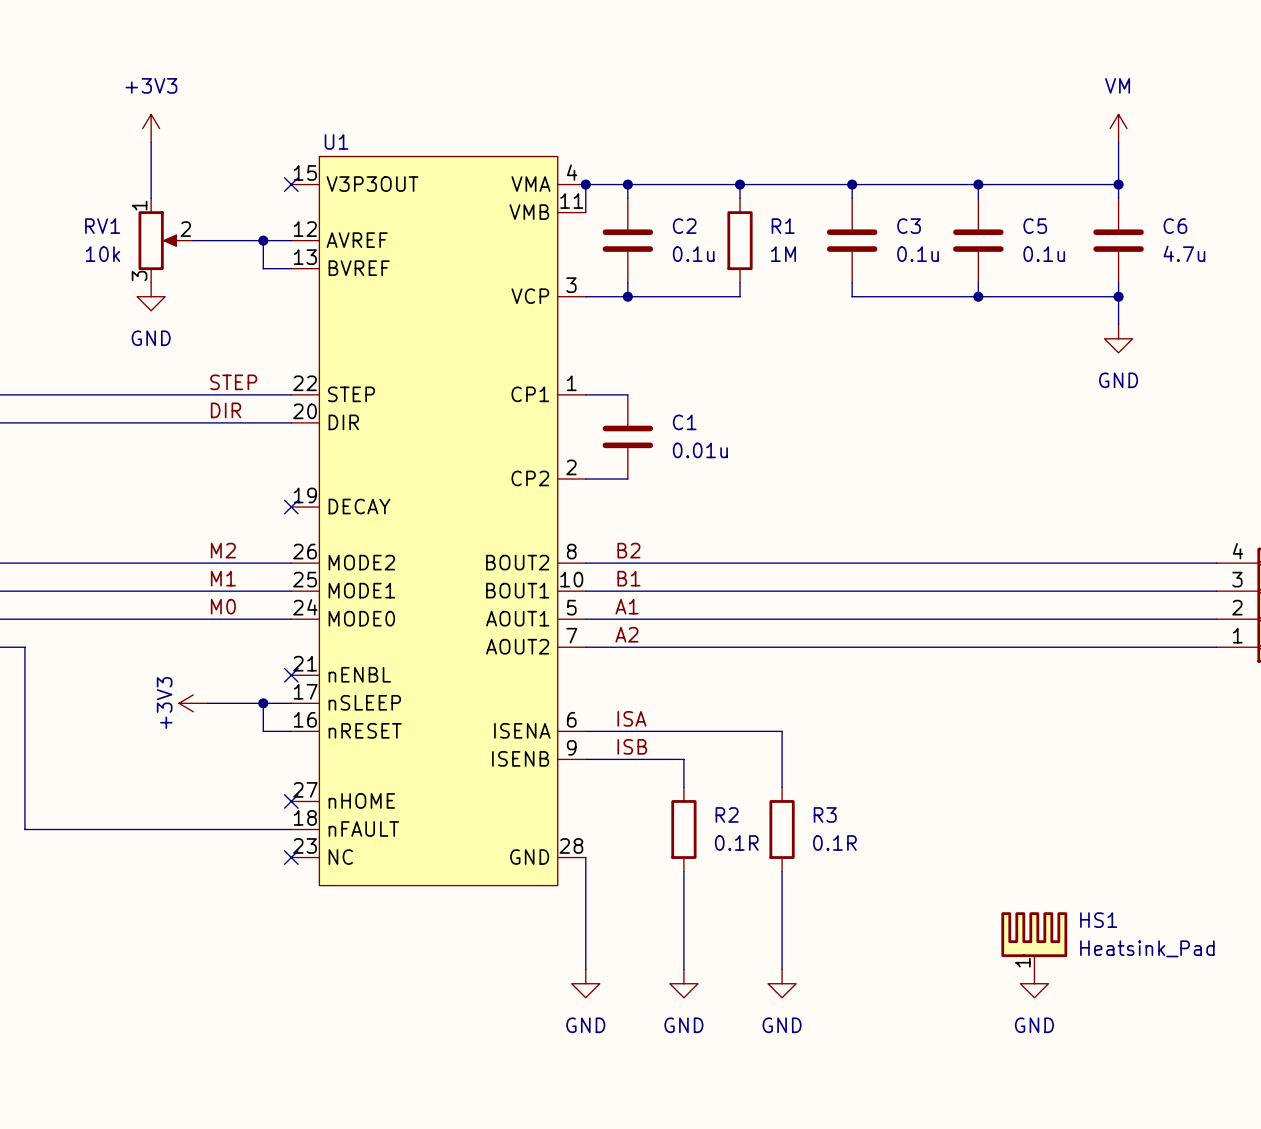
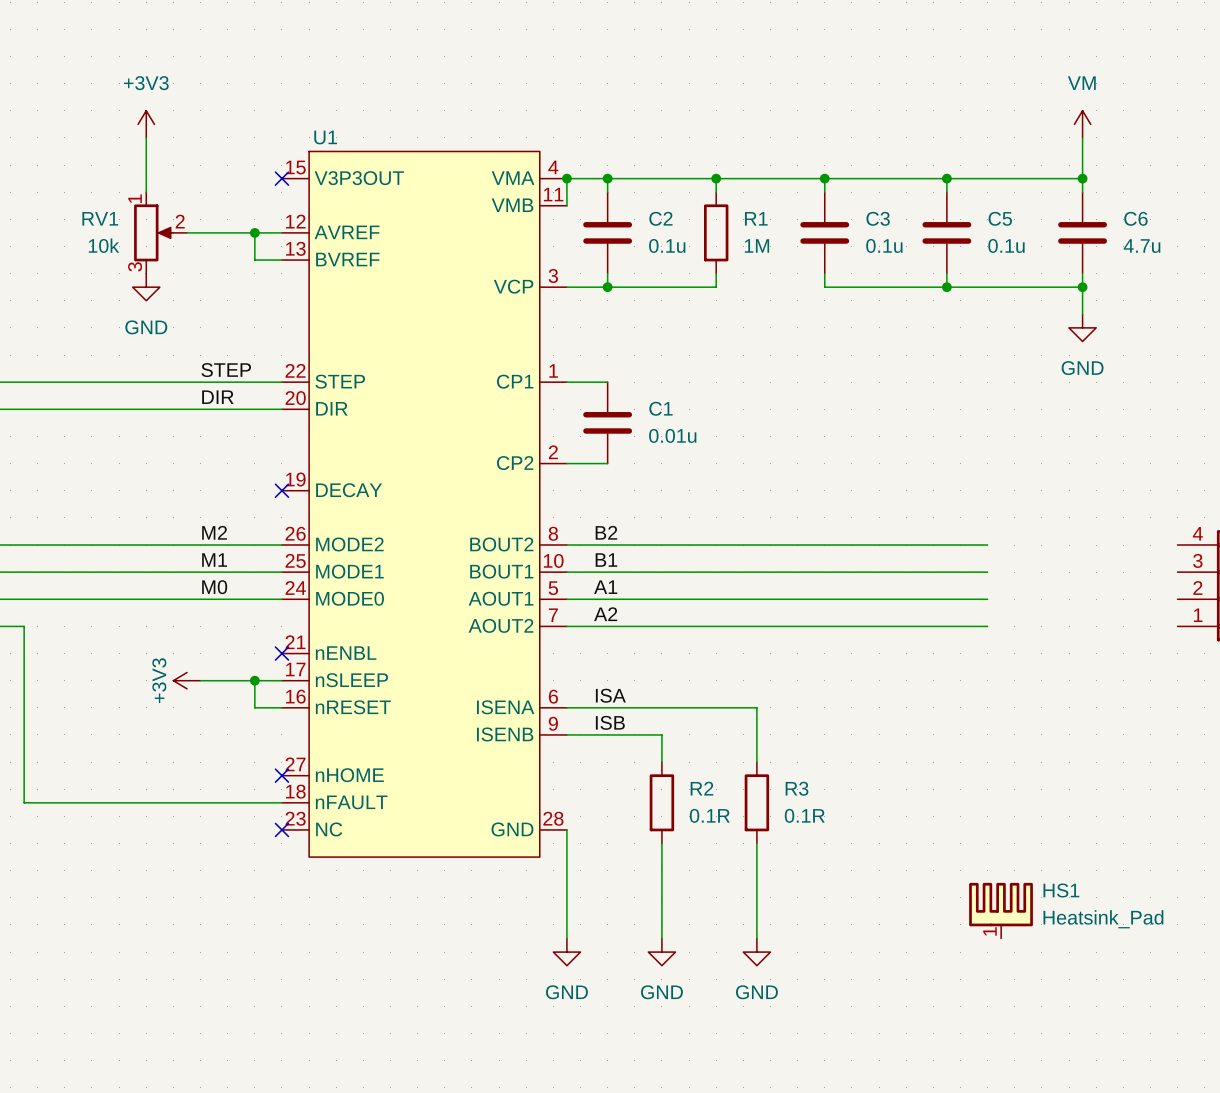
wire: (1020, 563) (1216, 563) -> none
wire: (1020, 591) (1216, 591) -> none
wire: (1020, 619) (1216, 619) -> none
wire: (1020, 647) (1216, 647) -> none
power symbol: GND (1034, 983) -> none

